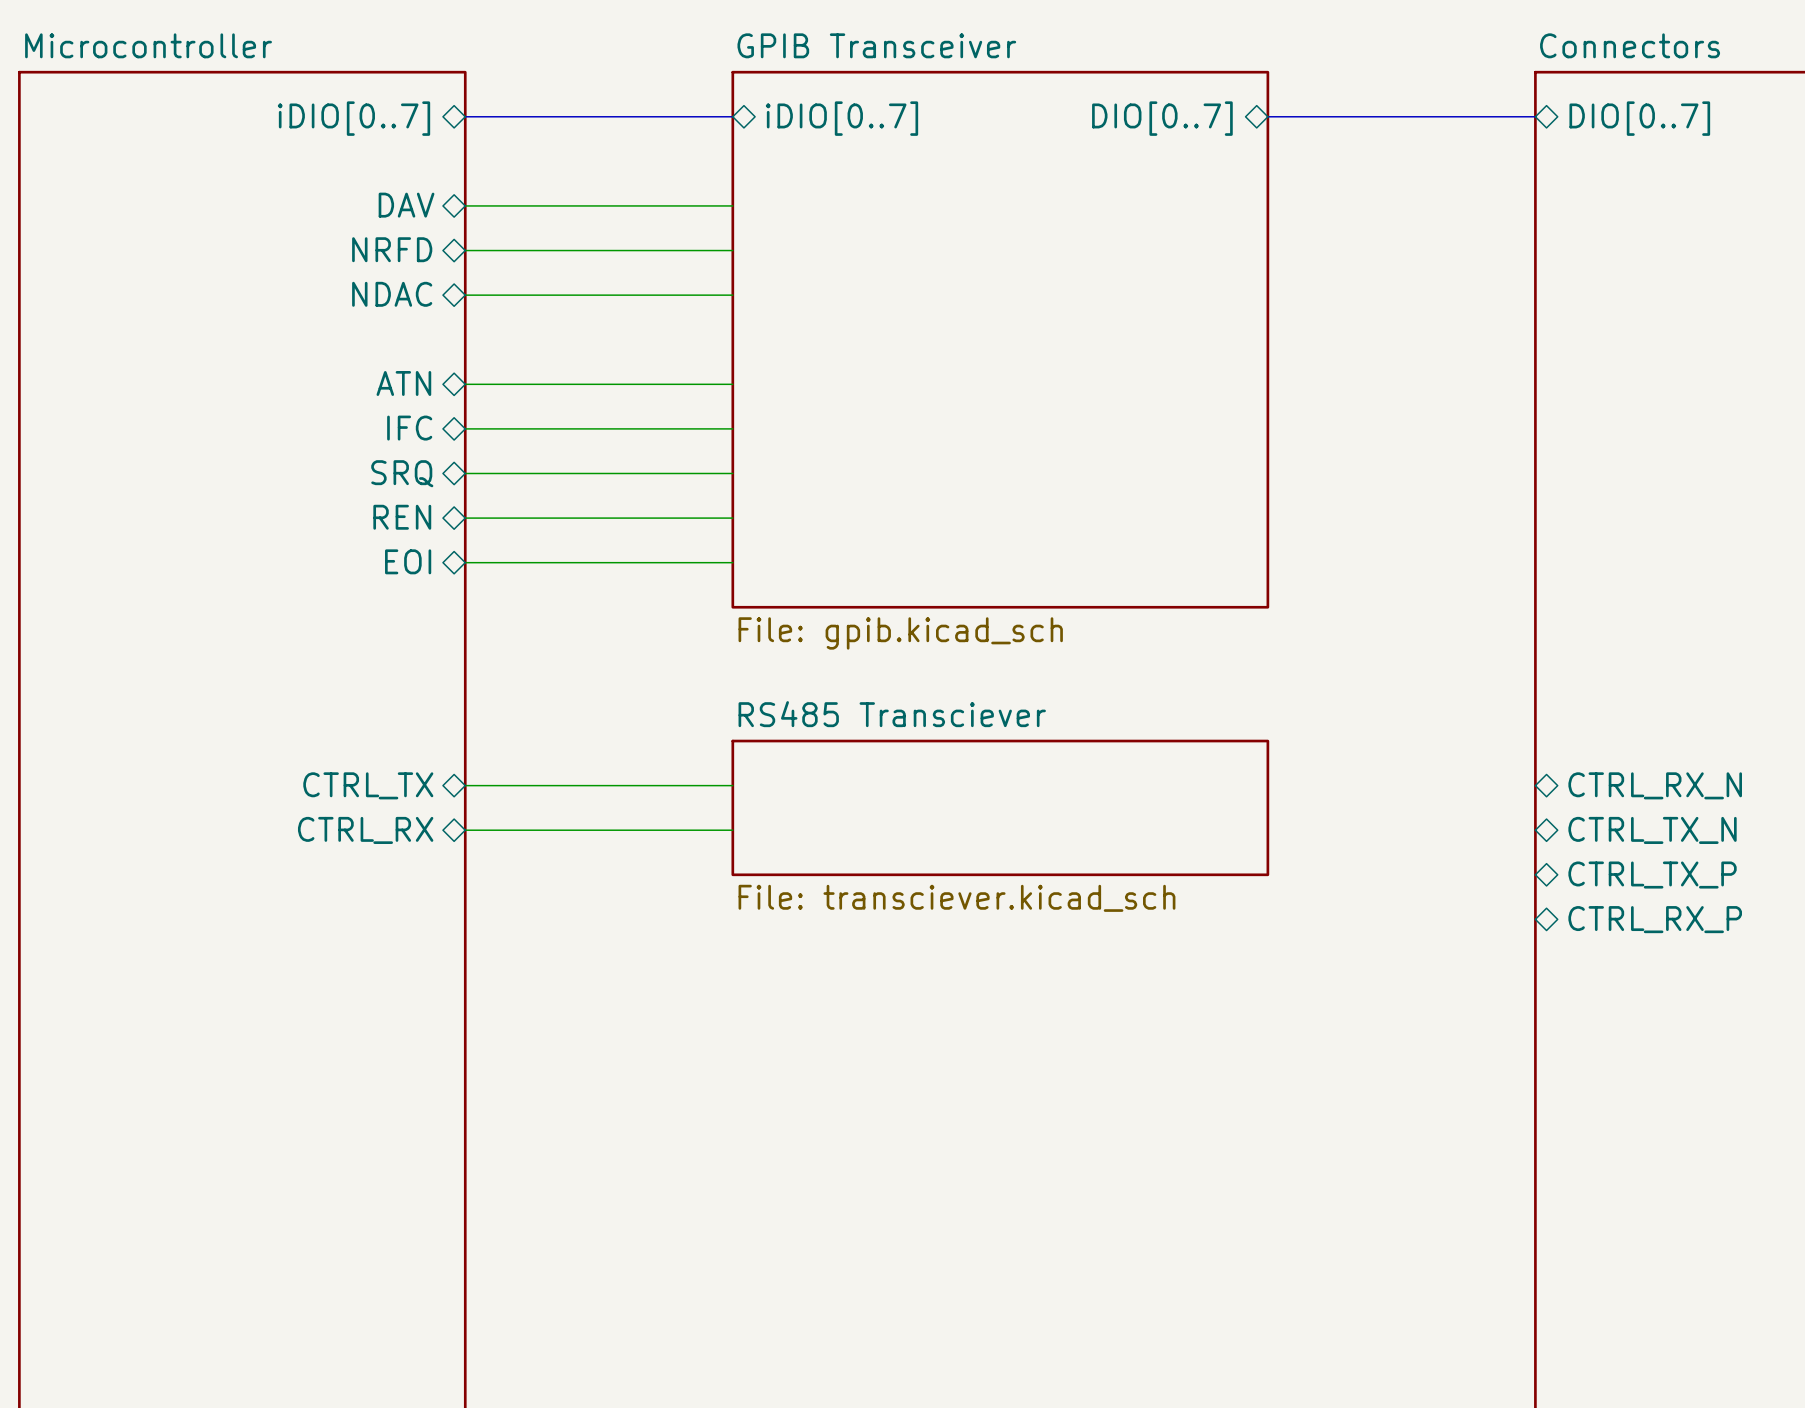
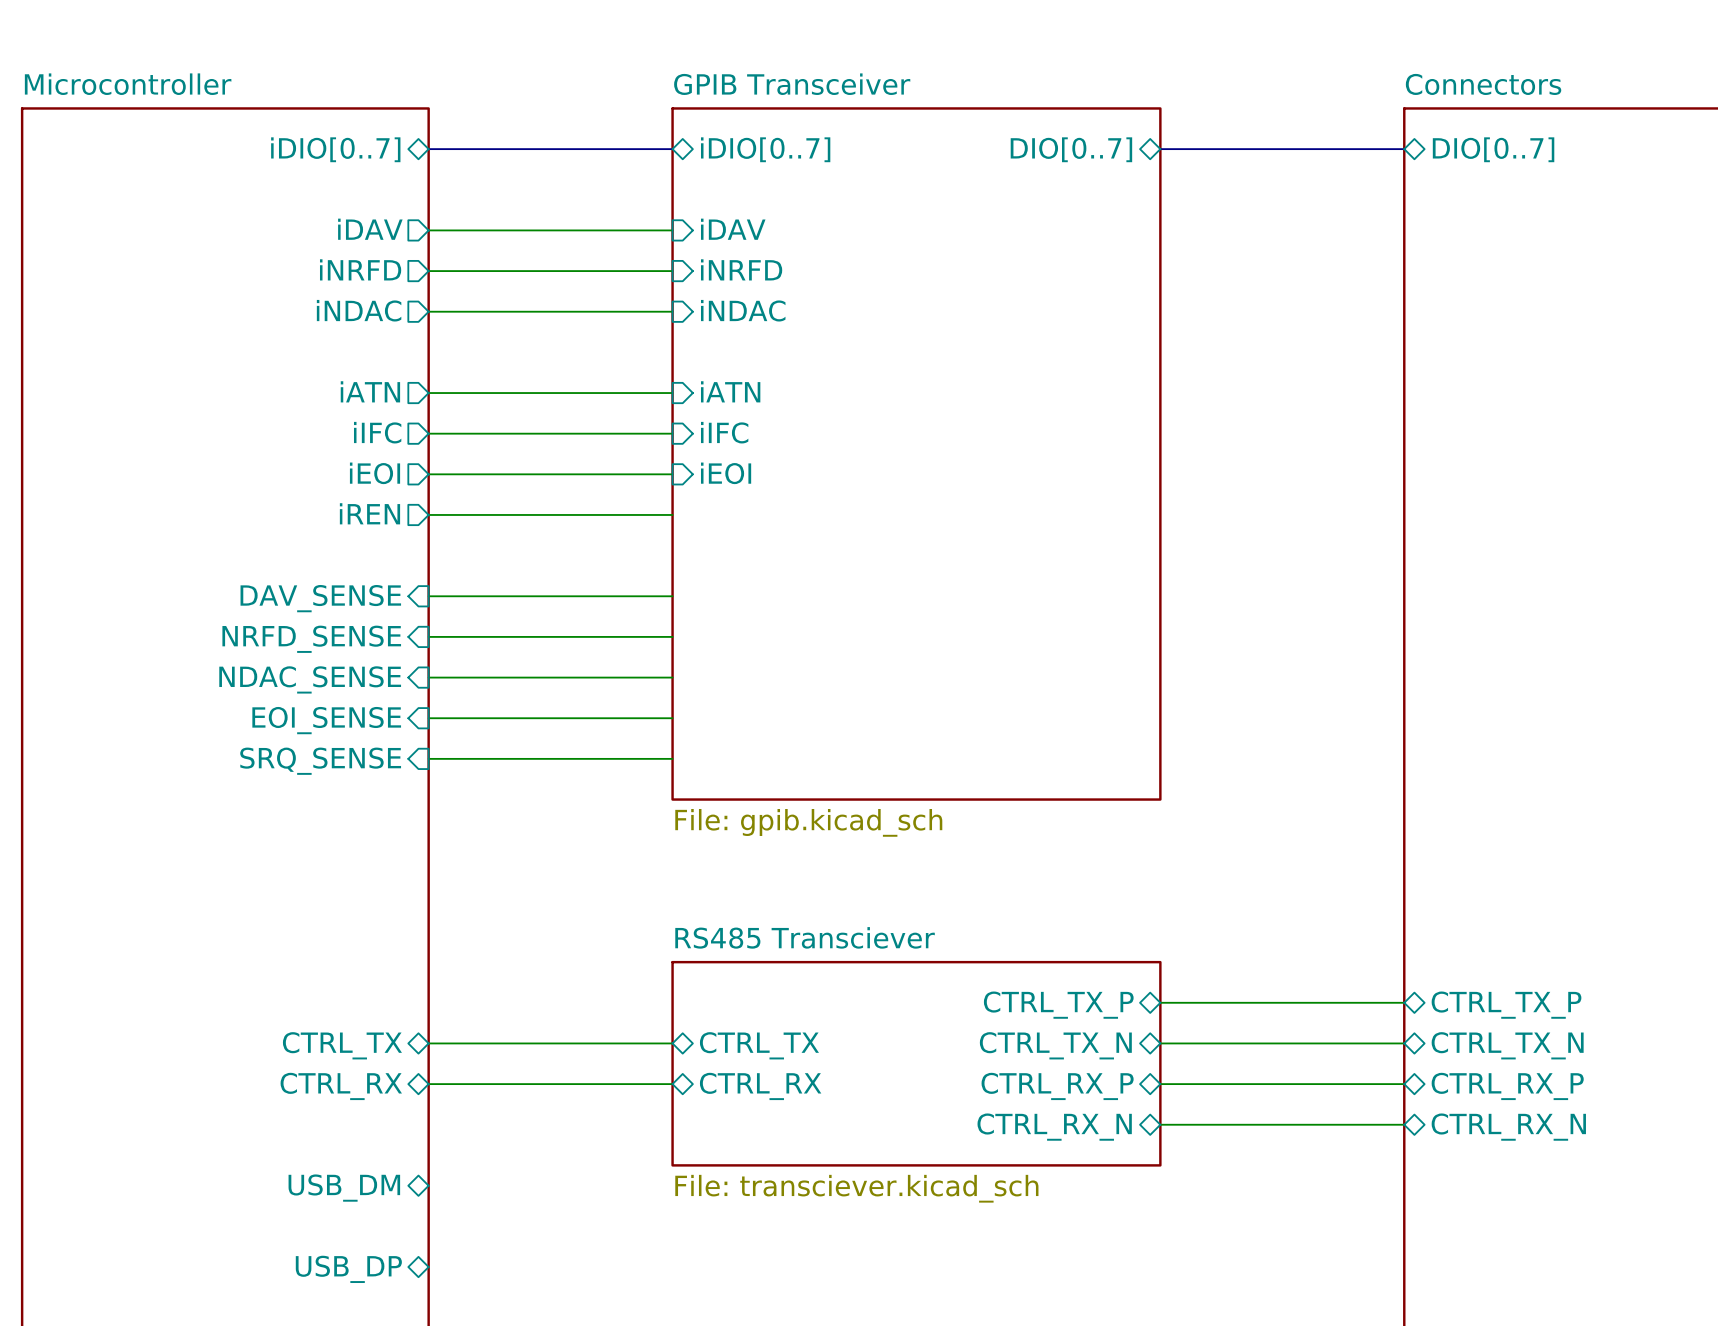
sheet pin shape: bidirectional (406, 205) -> output (370, 229)
sheet pin: DAV (406, 205) -> iDAV (370, 229)
sheet pin: none -> iDAV (733, 229)
sheet pin shape: bidirectional (392, 249) -> output (360, 269)
sheet pin: NRFD (392, 249) -> iNRFD (360, 269)
sheet pin: none -> iNRFD (741, 269)
sheet pin shape: bidirectional (392, 294) -> output (359, 310)
sheet pin: NDAC (392, 294) -> iNDAC (359, 310)
sheet pin: none -> iNDAC (743, 310)
sheet GPIB Transceiver: File: gpib.kicad_sch (1000, 339) -> none
sheet pin shape: bidirectional (403, 383) -> output (370, 391)
sheet pin: ATN (403, 383) -> iATN (370, 391)
sheet pin: none -> iATN (730, 391)
sheet pin shape: bidirectional (409, 428) -> output (377, 432)
sheet pin: IFC (409, 428) -> iIFC (377, 432)
sheet pin: none -> iIFC (724, 432)
sheet GPIB Transceiver: none -> File: gpib.kicad_sch (916, 454)
sheet pin: none -> iEOI (726, 473)
sheet pin shape: bidirectional (402, 473) -> output (375, 473)
sheet pin: SRQ (402, 473) -> iEOI (375, 473)
sheet pin shape: bidirectional (402, 517) -> output (369, 513)
sheet pin: REN (402, 517) -> iREN (369, 513)
sheet pin: EOI (408, 561) -> none
wire: (465, 562) (732, 562) -> (428, 596) (672, 596)
sheet pin: none -> DAV_SENSE (320, 598)
wire: none -> (428, 636) (672, 636)
sheet pin: none -> NRFD_SENSE (311, 639)
sheet pin: none -> NDAC_SENSE (310, 679)
wire: none -> (428, 677) (672, 677)
sheet RS485 Transciever name position: RS485 Transciever (892, 714) -> RS485 Transciever (805, 937)
sheet RS485 Transciever shape: [731, 739, 1270, 877] -> [671, 960, 1162, 1167]
sheet pin: none -> EOI_SENSE (326, 720)
sheet pin shape: bidirectional (368, 785) -> input (320, 761)
sheet pin: CTRL_TX (368, 785) -> SRQ_SENSE (320, 761)
sheet pin: CTRL_RX_N (1655, 785) -> none
sheet pin: CTRL_RX (365, 830) -> none
wire: (465, 830) (732, 830) -> (428, 718) (672, 718)
sheet pin: CTRL_TX_N (1652, 830) -> none
sheet pin position: CTRL_TX_P (1652, 875) -> CTRL_TX_P (1506, 1005)
sheet RS485 Transciever value position: File: transciever.kicad_sch (956, 898) -> File: transciever.kicad_sch (856, 1188)
sheet pin: CTRL_RX_P (1655, 919) -> none
sheet pin: none -> CTRL_TX_P (1058, 1005)
wire: none -> (1160, 1002) (1404, 1002)
sheet pin: none -> CTRL_TX (342, 1045)
wire: none -> (428, 1043) (672, 1043)
sheet pin: none -> CTRL_TX (759, 1045)
sheet pin: none -> CTRL_TX_N (1055, 1045)
wire: none -> (1160, 1043) (1404, 1043)
sheet pin: none -> CTRL_TX_N (1507, 1045)
sheet pin: none -> CTRL_RX (341, 1086)
wire: none -> (428, 1084) (672, 1084)
sheet pin: none -> CTRL_RX (760, 1086)
sheet pin: none -> CTRL_RX_P (1057, 1086)
wire: none -> (1160, 1084) (1404, 1084)
sheet pin: none -> CTRL_RX_P (1507, 1086)
wire: none -> (1160, 1124) (1404, 1124)
sheet pin: none -> CTRL_RX_N (1054, 1127)
sheet pin: none -> CTRL_RX_N (1508, 1127)
sheet pin: none -> USB_DM (344, 1188)
sheet pin: none -> USB_DP (348, 1269)

